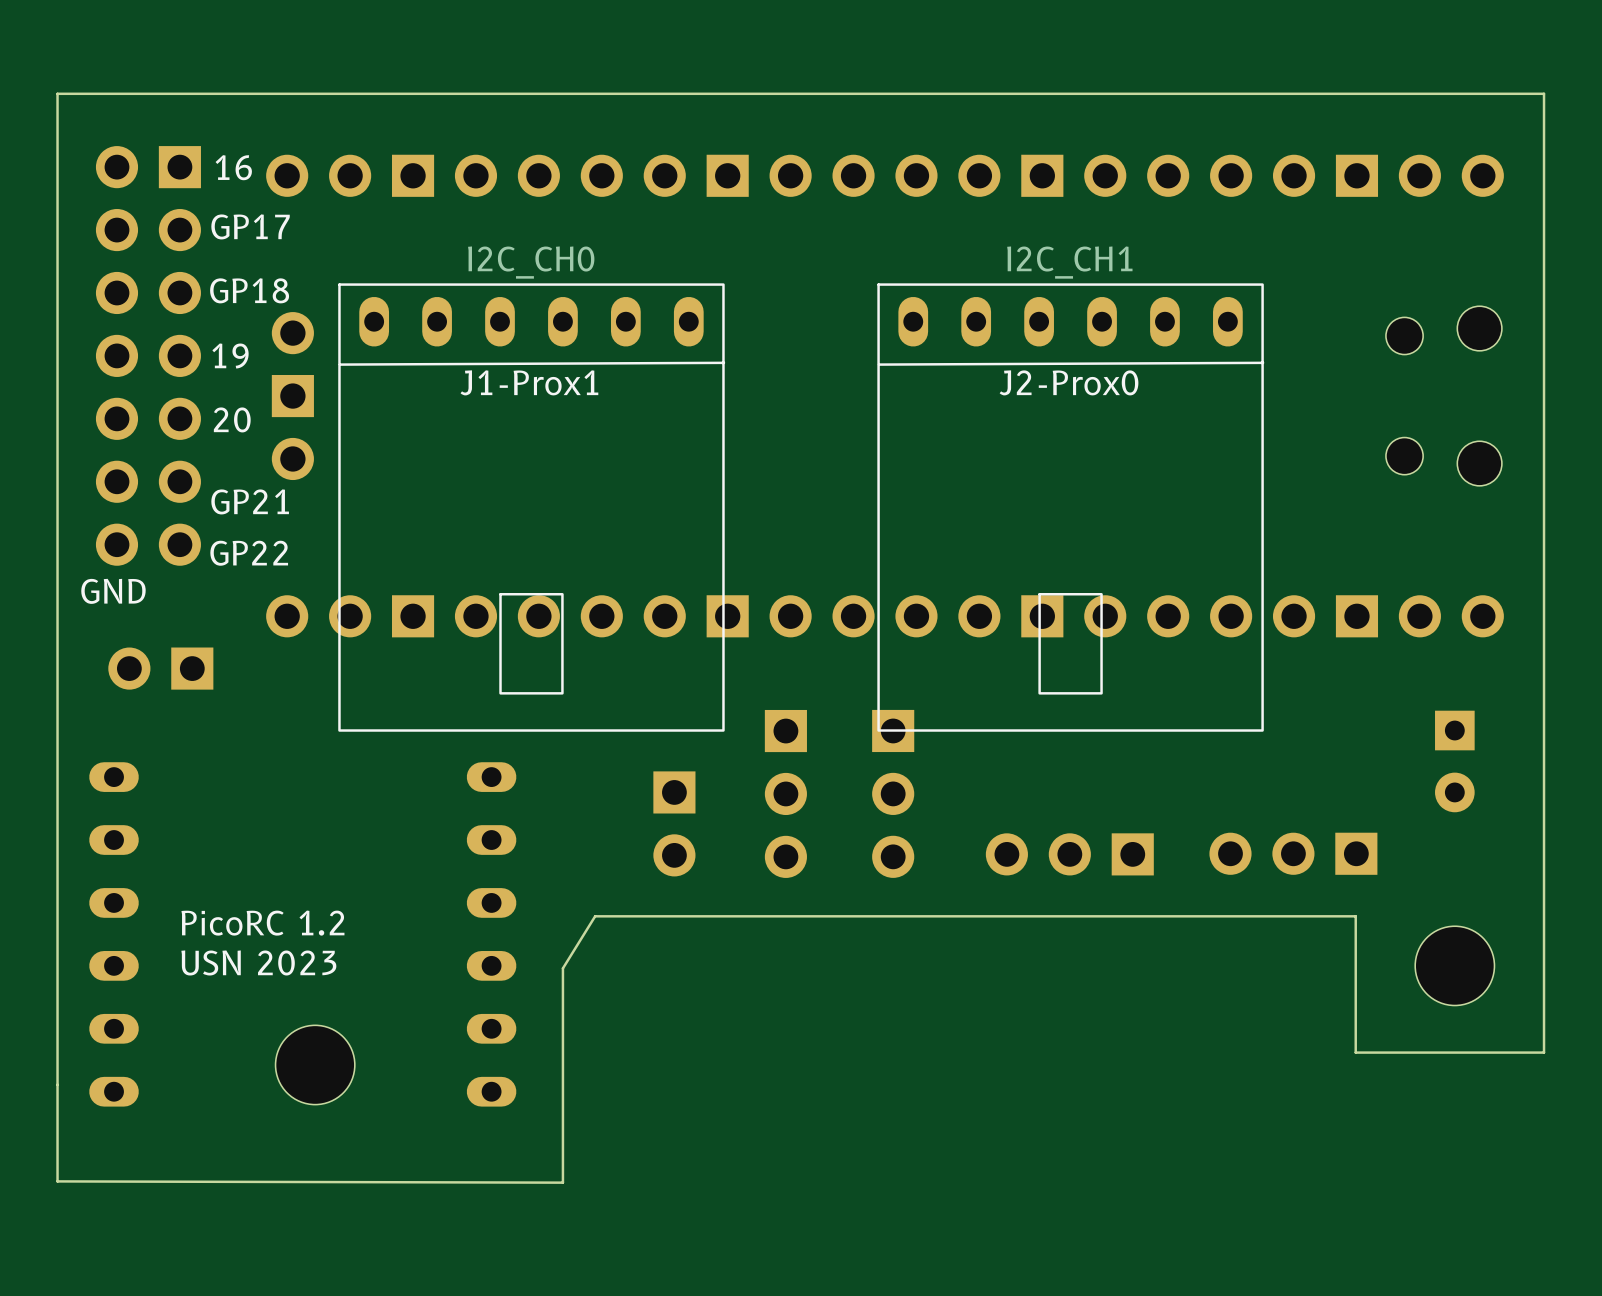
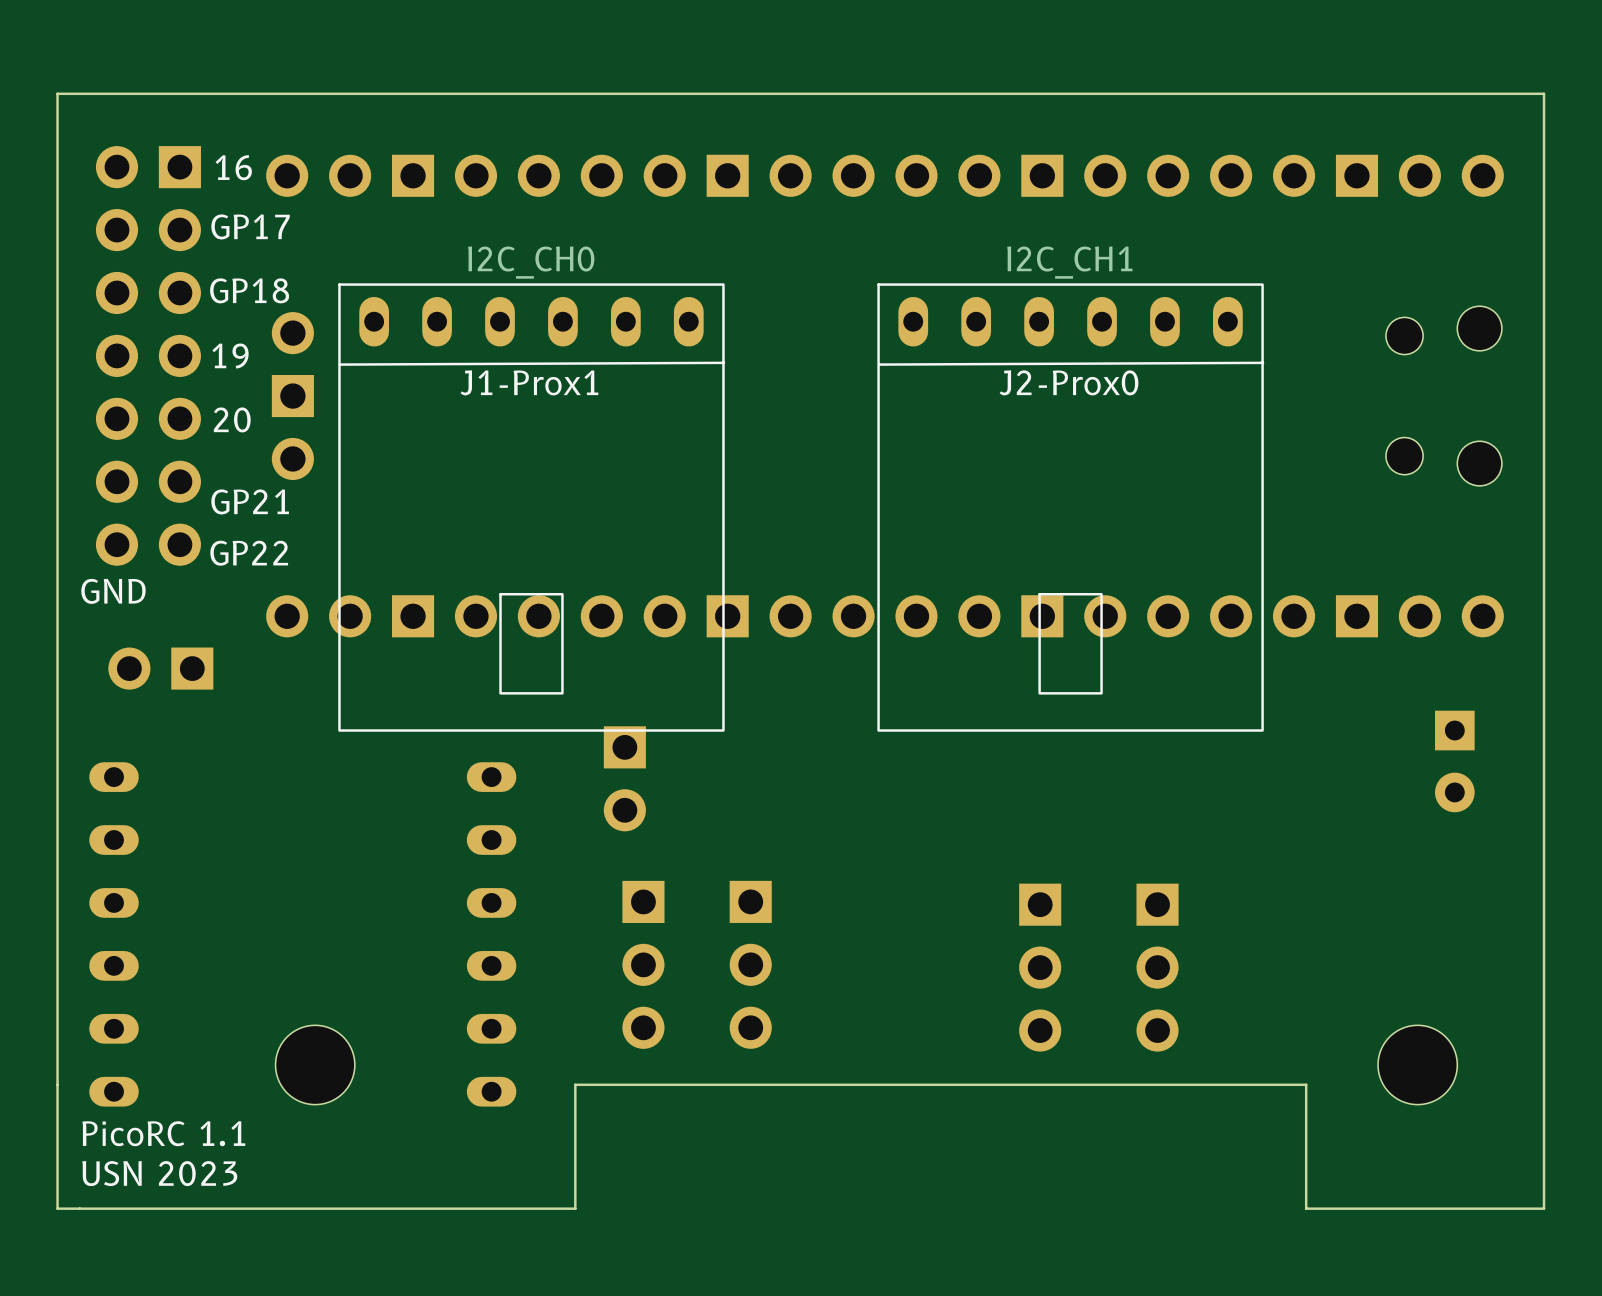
part: (785, 793) -> none
part: (893, 793) -> none
part position: (674, 823) -> (624, 778)
part: (1293, 853) -> none
part: (1069, 854) -> none
text: PicoRC 1.2 (262, 923) -> none
text position: USN 2023 (258, 962) -> USN 2023 (159, 1173)
part: none -> (643, 964)
part: none -> (750, 964)
part position: (1454, 965) -> (1417, 1064)
part: none -> (1040, 967)
part: none -> (1157, 967)
board edge: (1544, 1052) (1355, 1052) (1355, 916) (595, 916) (562, 968) (562, 1182) (57, 1181) -> (1544, 1052) (1544, 1208) (1306, 1208) (1306, 1084) (575, 1084) (575, 1208) (57, 1208) (57, 1181)
text: none -> PicoRC 1.1 (163, 1133)

